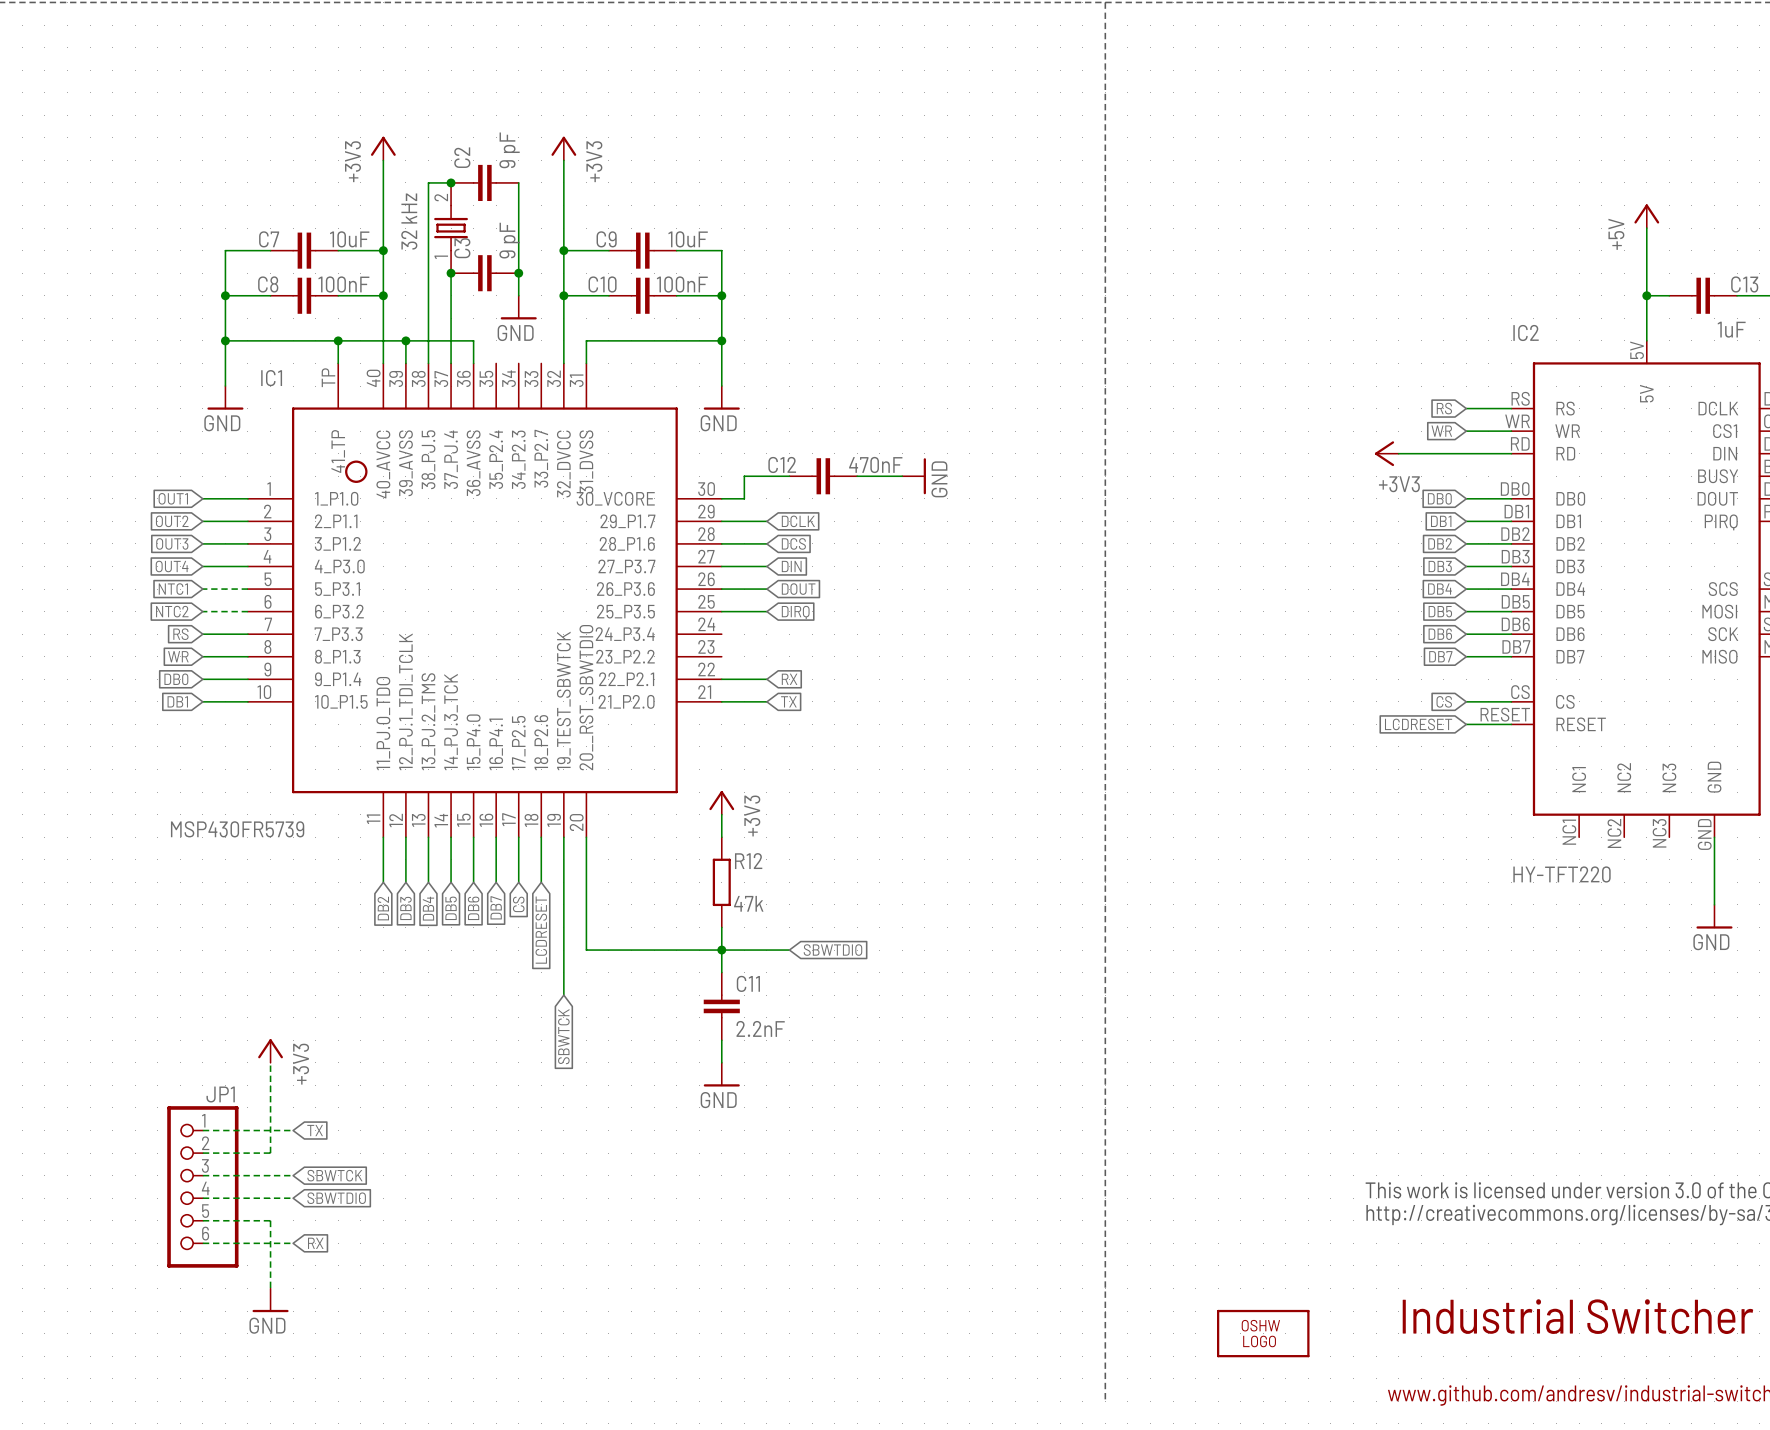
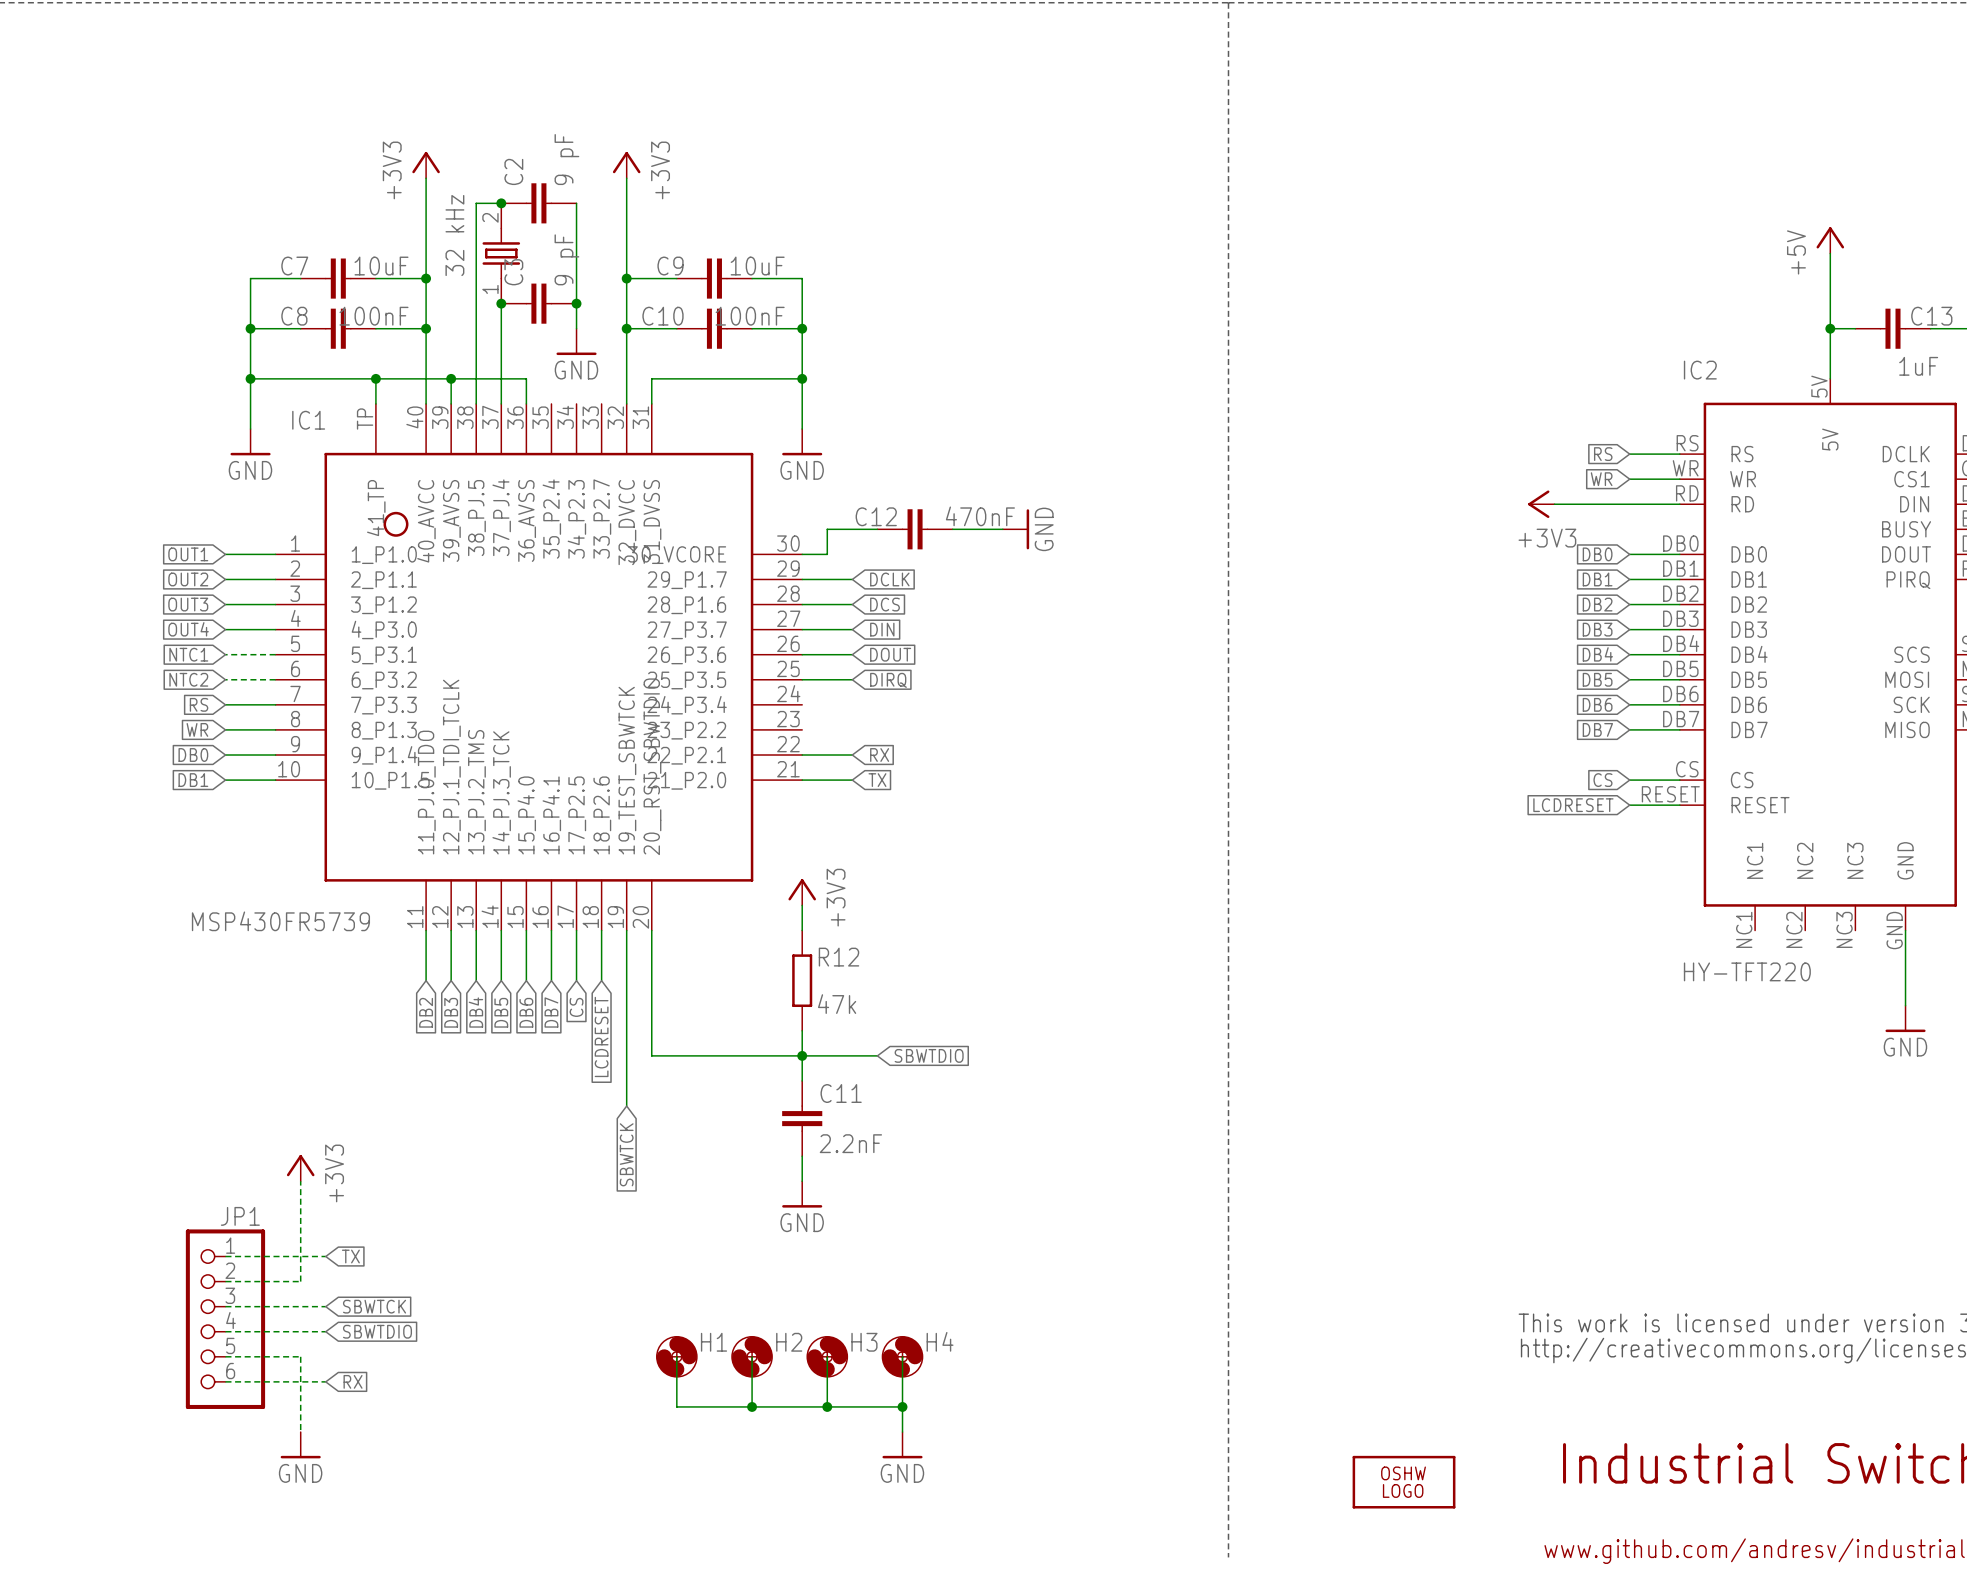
wire: none -> (676, 1356) (676, 1406) (902, 1406)
H1: none -> (676, 1356)
wire: none -> (752, 1356) (752, 1406)
H2: none -> (752, 1356)
wire: none -> (827, 1356) (827, 1406)
H3: none -> (827, 1356)
wire: none -> (902, 1356) (902, 1432)
H4: none -> (902, 1356)
junction: none -> (752, 1406)
junction: none -> (827, 1406)
junction: none -> (902, 1406)
power symbol: none -> GND (902, 1445)

